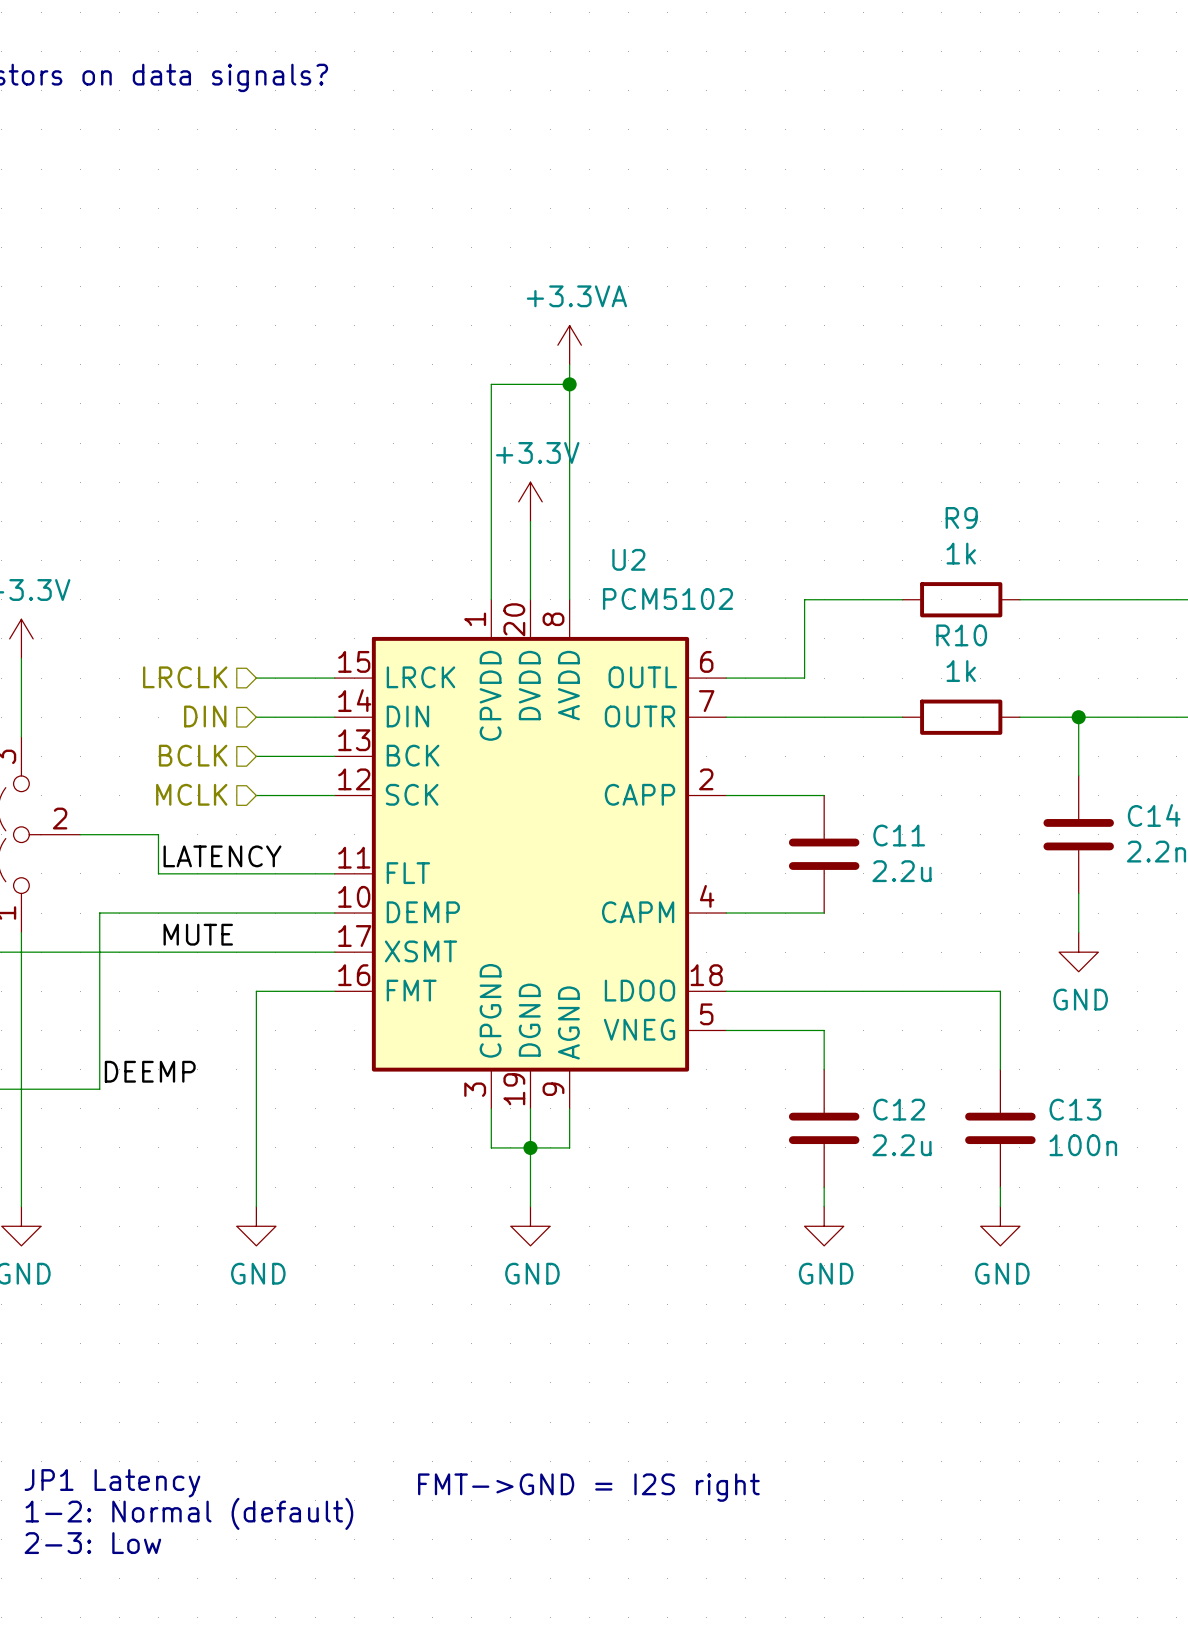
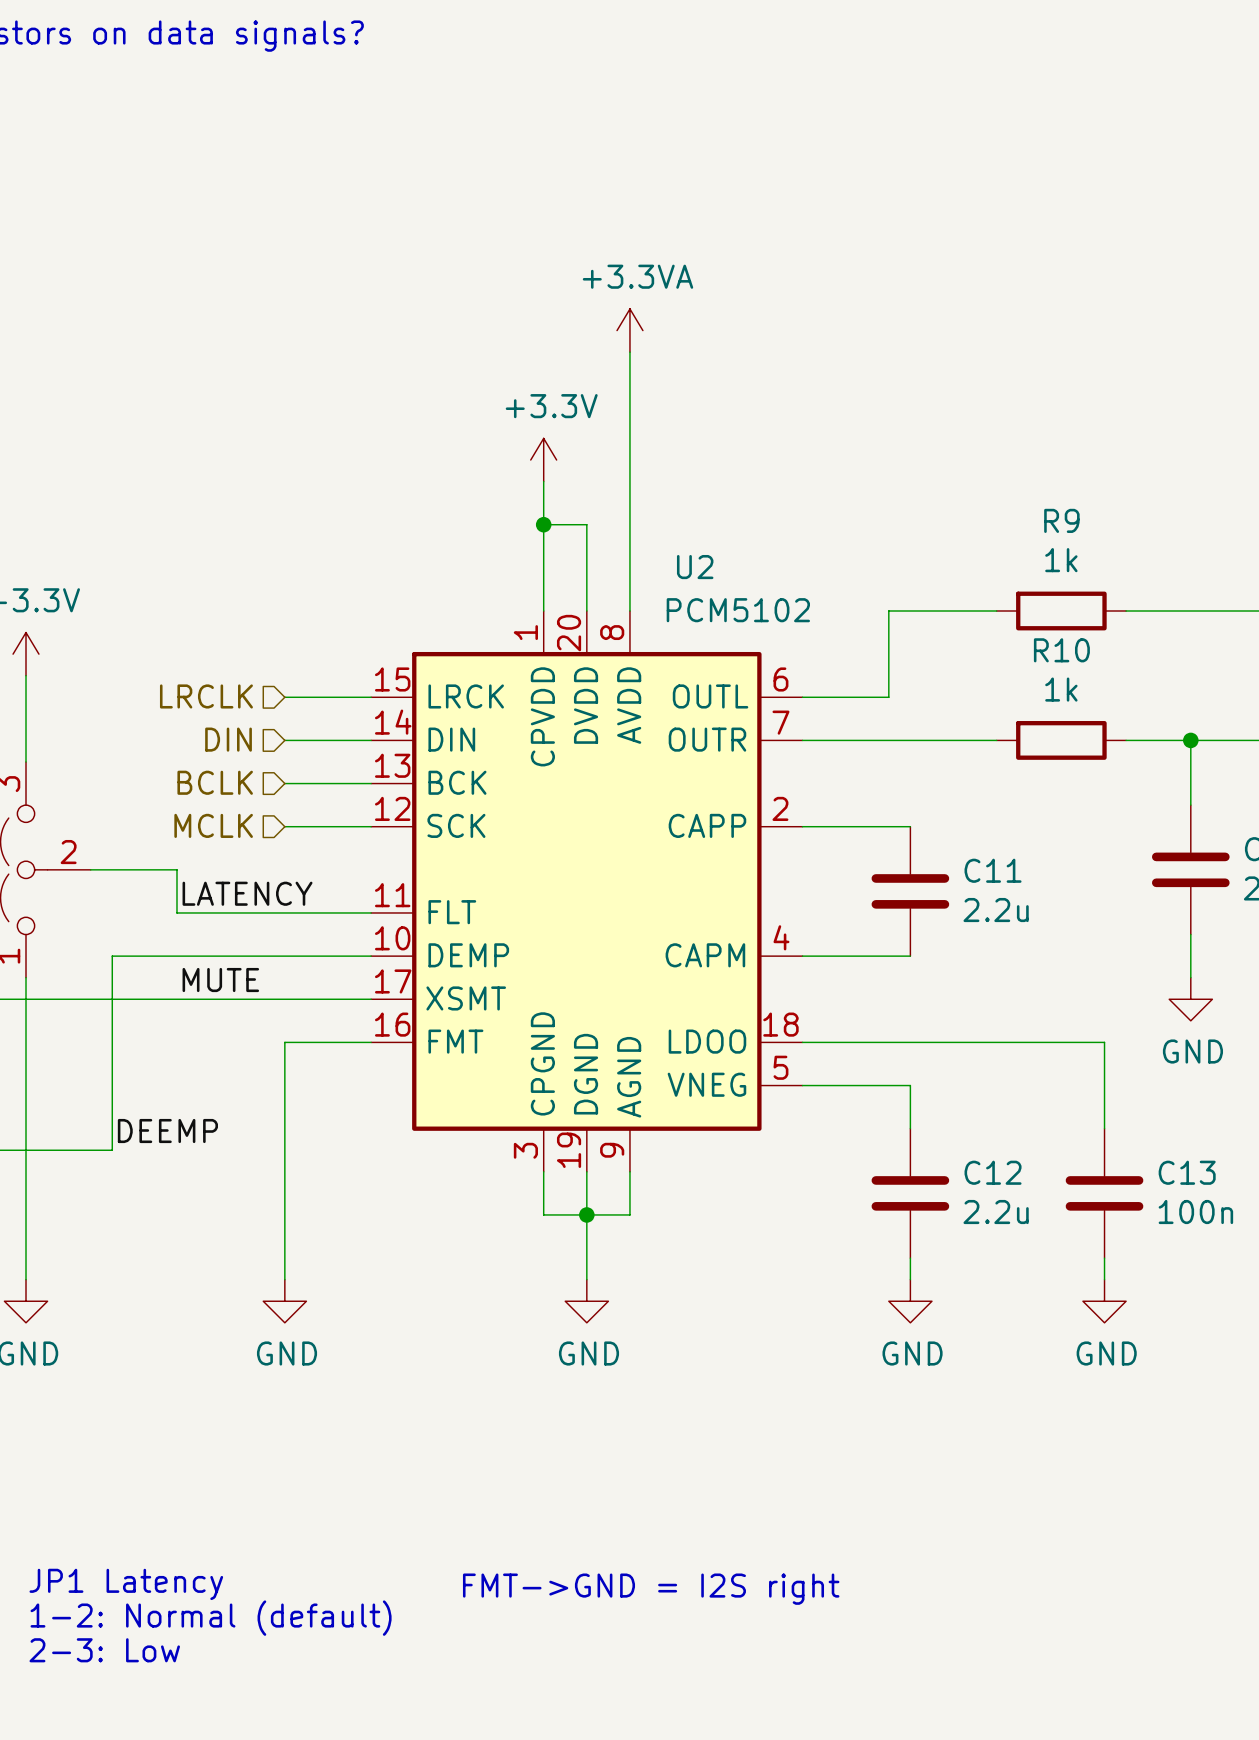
wire: (569, 384) (491, 384) (491, 482) -> none
junction: (569, 384) -> none
power symbol position: +3.3V (530, 501) -> +3.3V (543, 460)
wire: none -> (543, 524) (586, 524)
junction: none -> (543, 524)

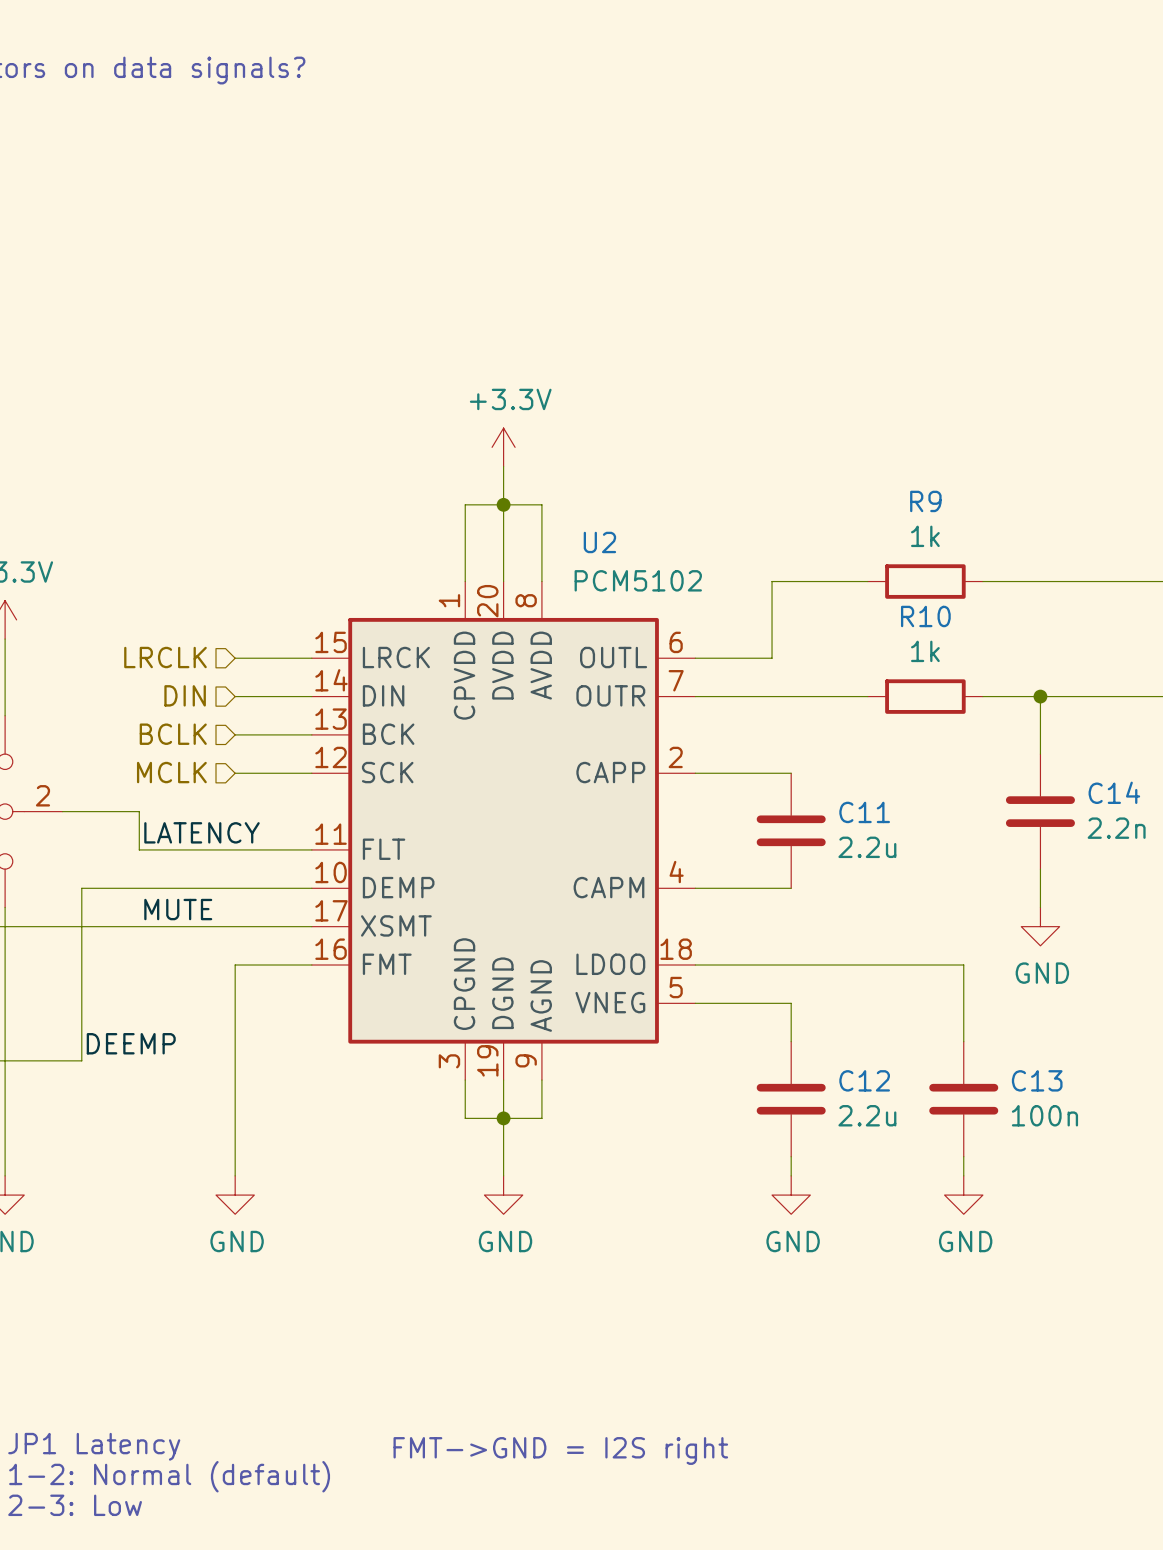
power symbol: +3.3VA (629, 330) -> none
wire: (629, 352) (629, 524) -> (503, 466) (503, 504) (541, 504)
power symbol position: +3.3V (543, 460) -> +3.3V (503, 447)
wire: (543, 481) (543, 524) -> none
junction position: (543, 524) -> (503, 504)

